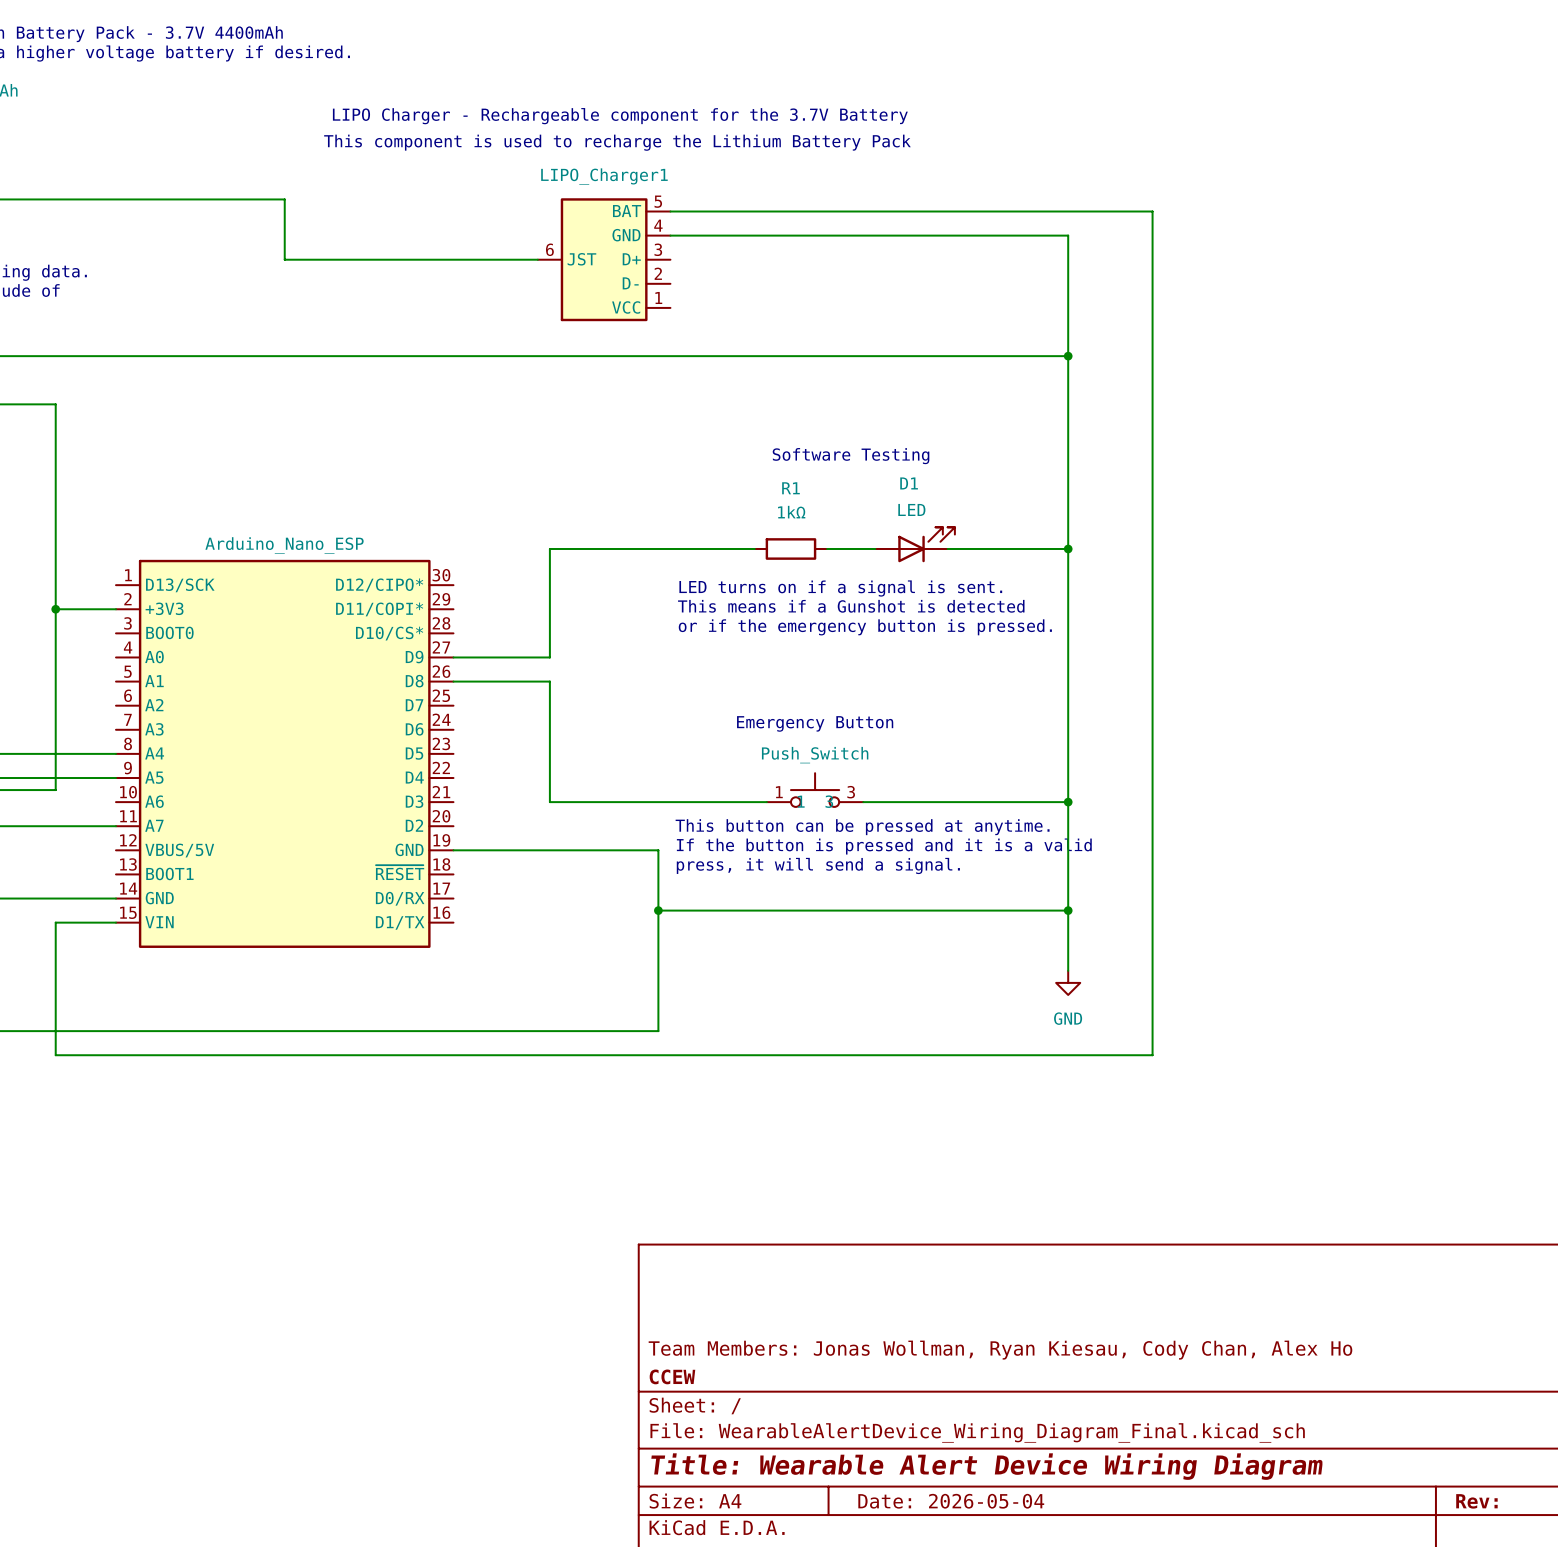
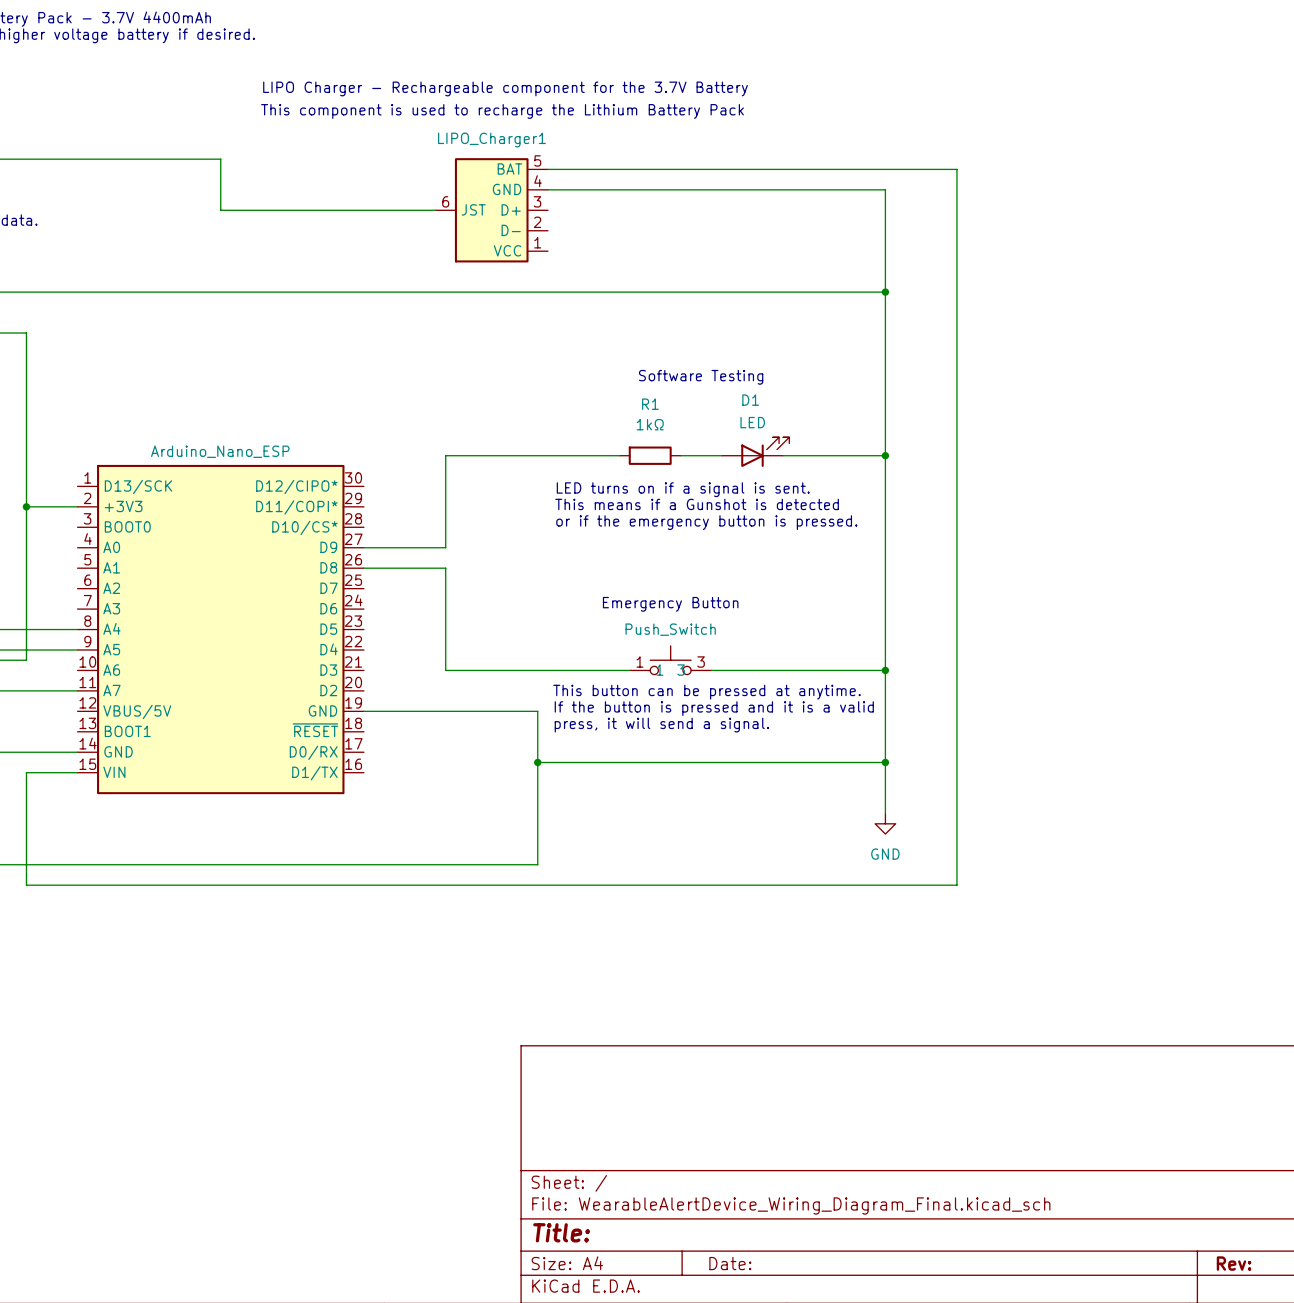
title block: Team Members: Jonas Wollman, Ryan Kiesau, Cody Chan, Alex Ho (1000, 1350) -> none
title block: CCEW (672, 1376) -> none
title block: Title: Wearable Alert Device Wiring Diagram (987, 1466) -> Title: (561, 1232)
title block: Date: 2026-05-04 (951, 1501) -> Date: (730, 1263)

